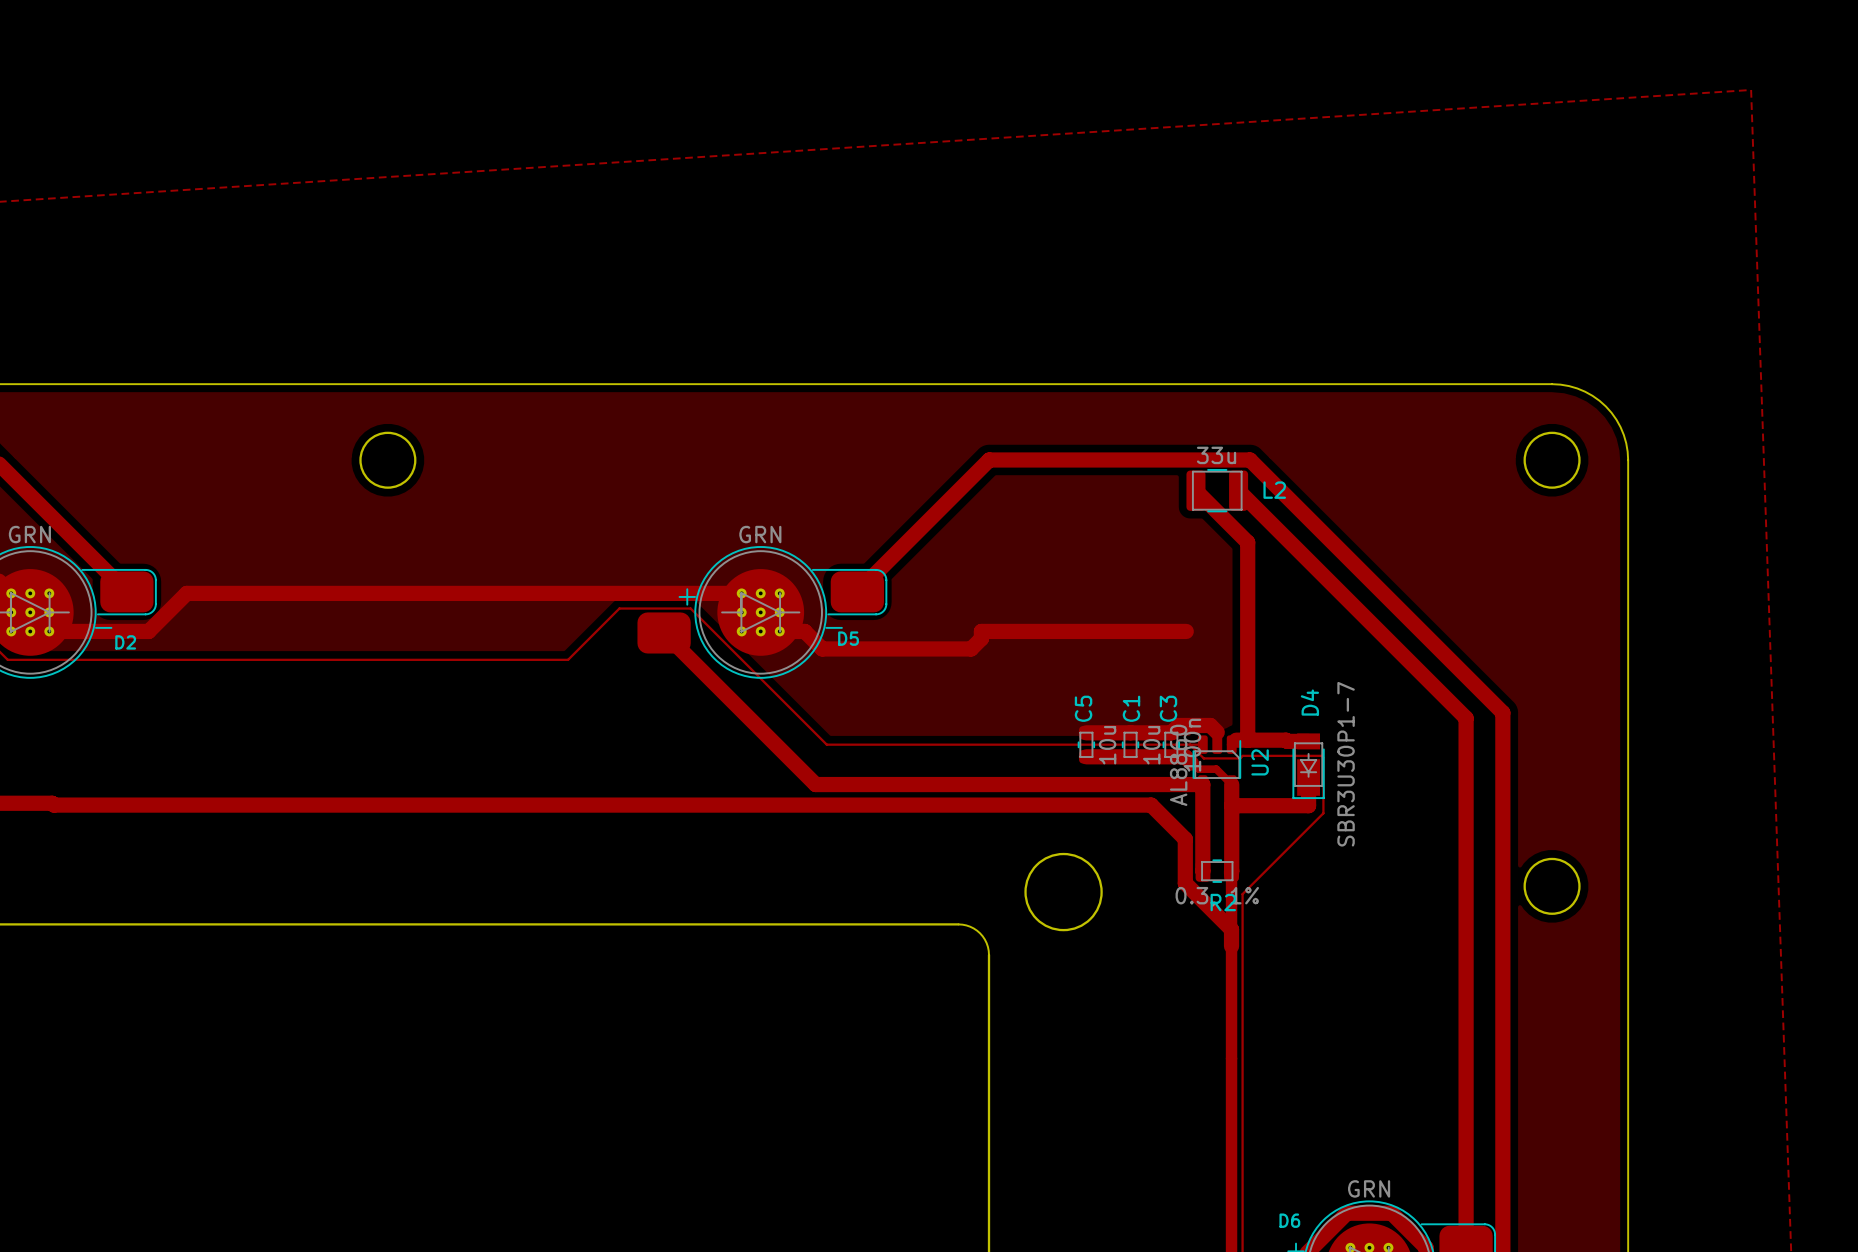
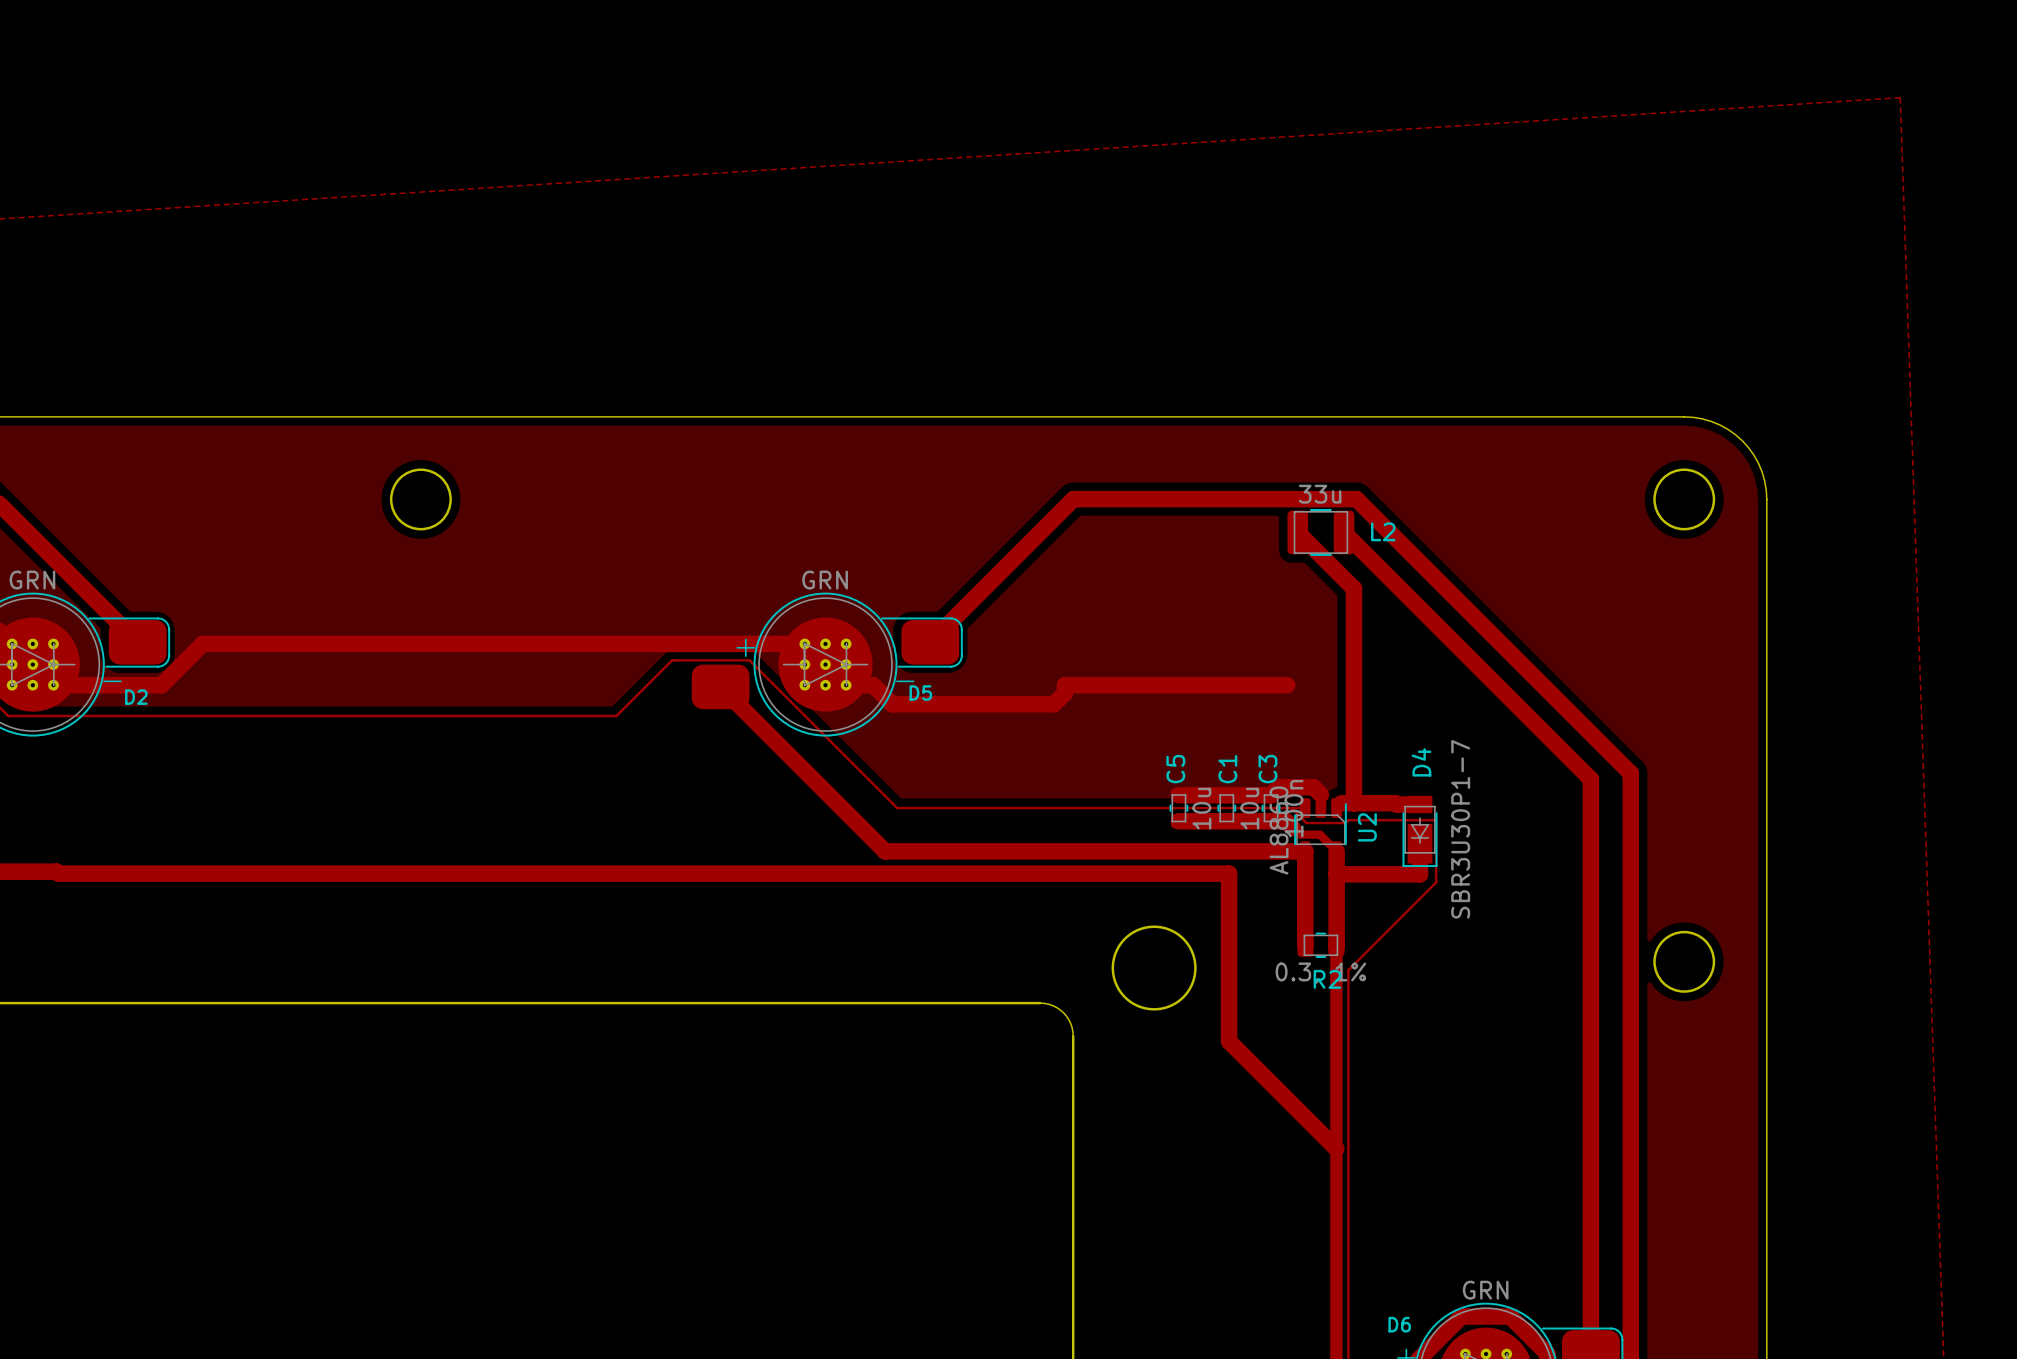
top track: (1132, 805) (1151, 805) (1185, 839) (1185, 883) (1231, 929) (1231, 946) -> (1229, 873) (1229, 1041) (1336, 1148)

